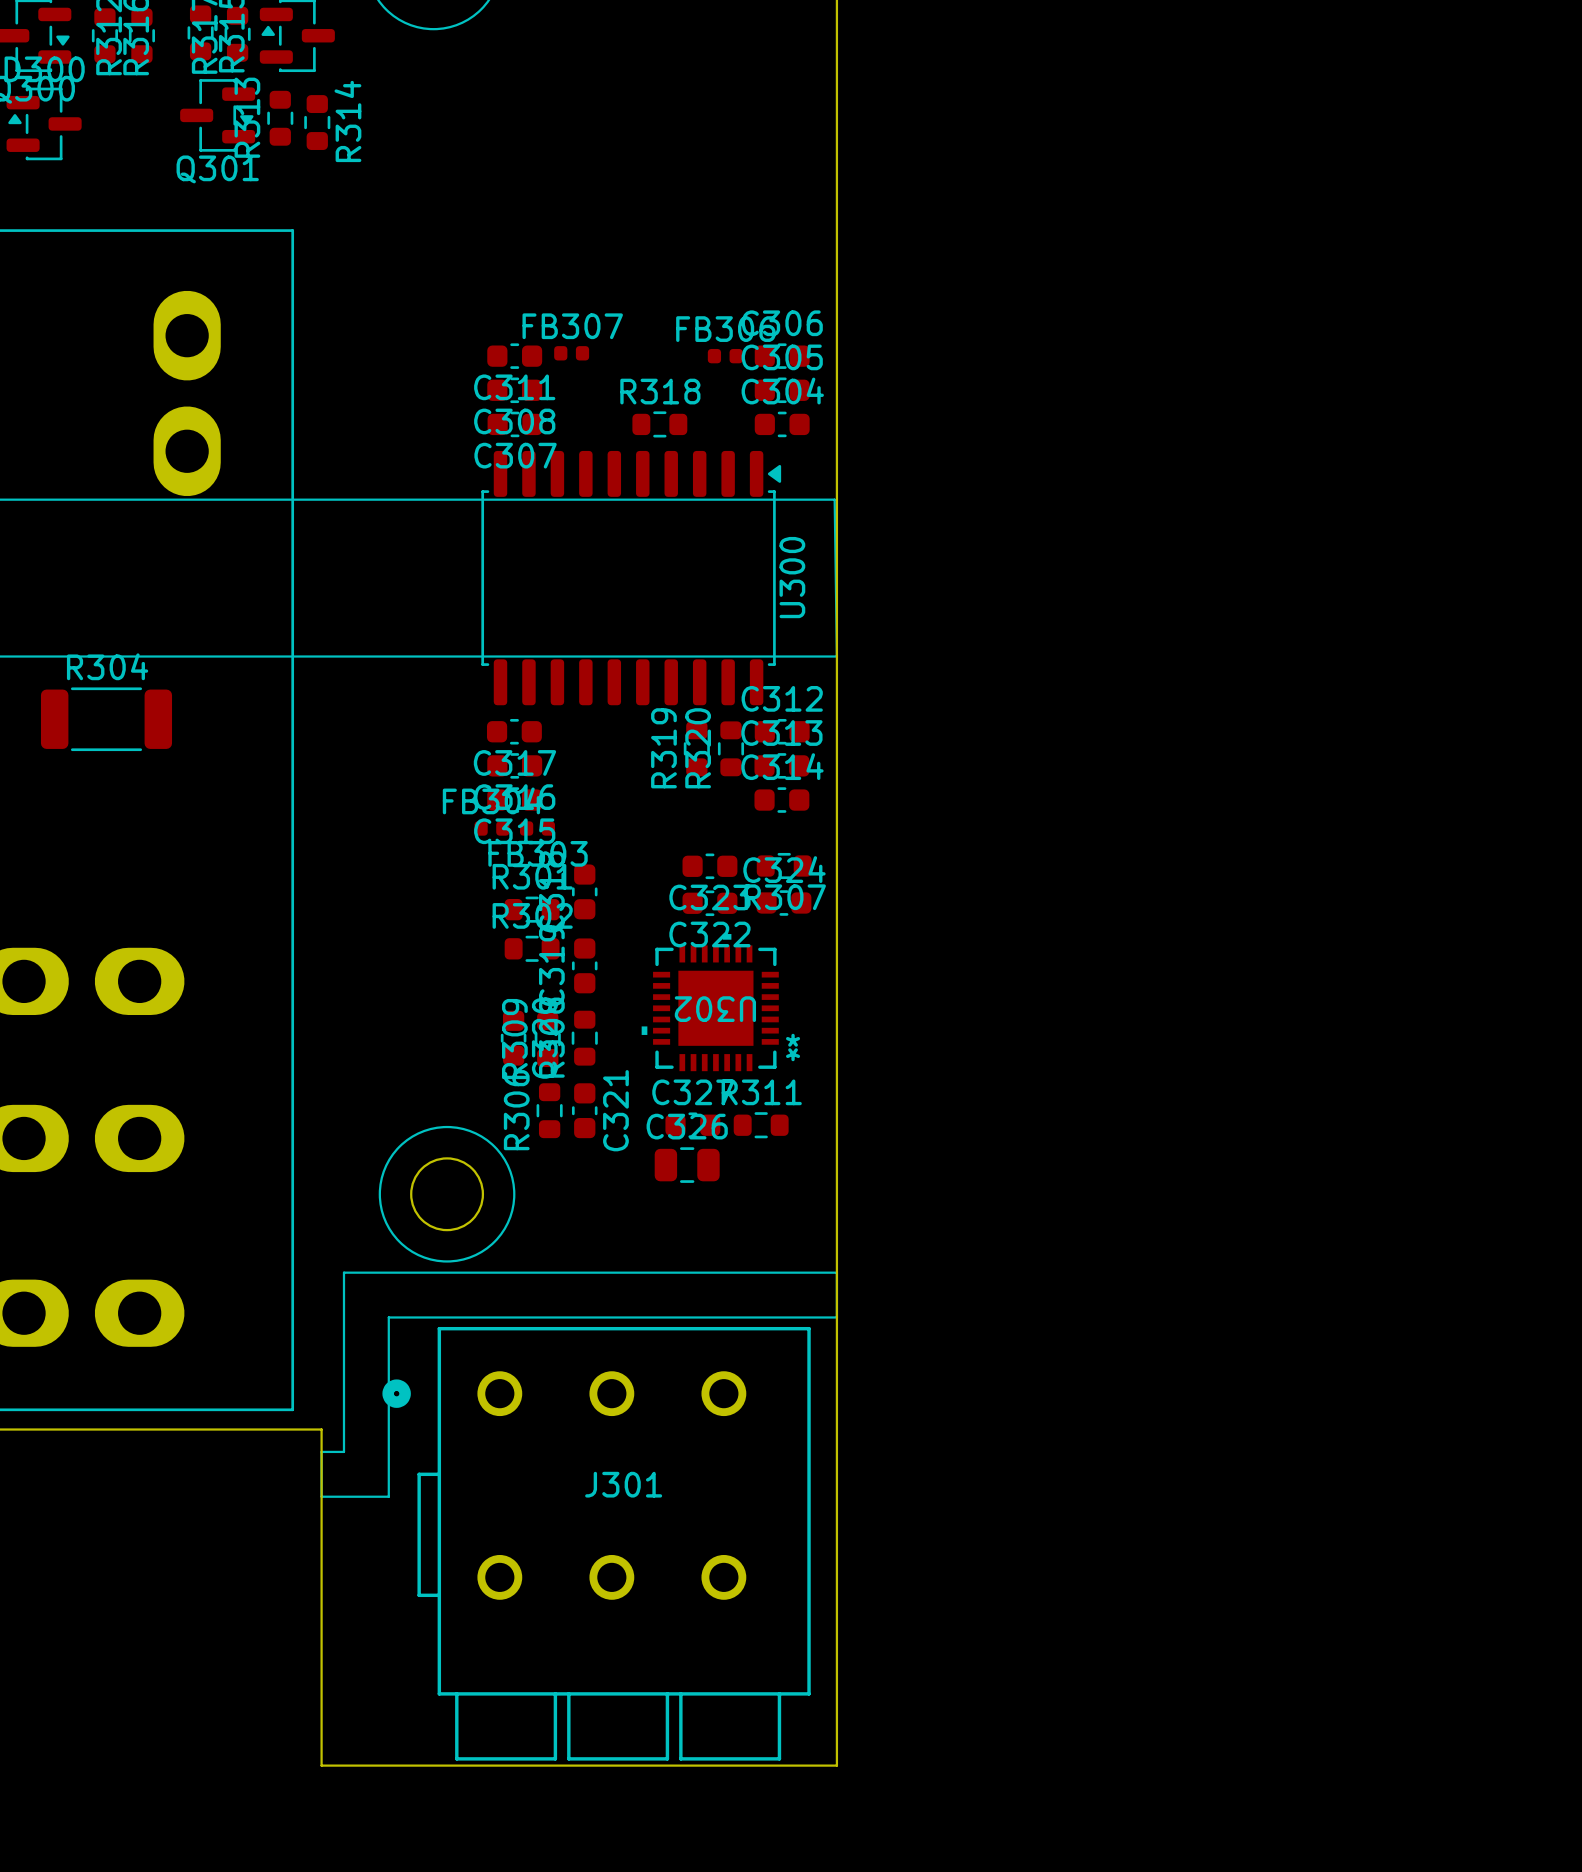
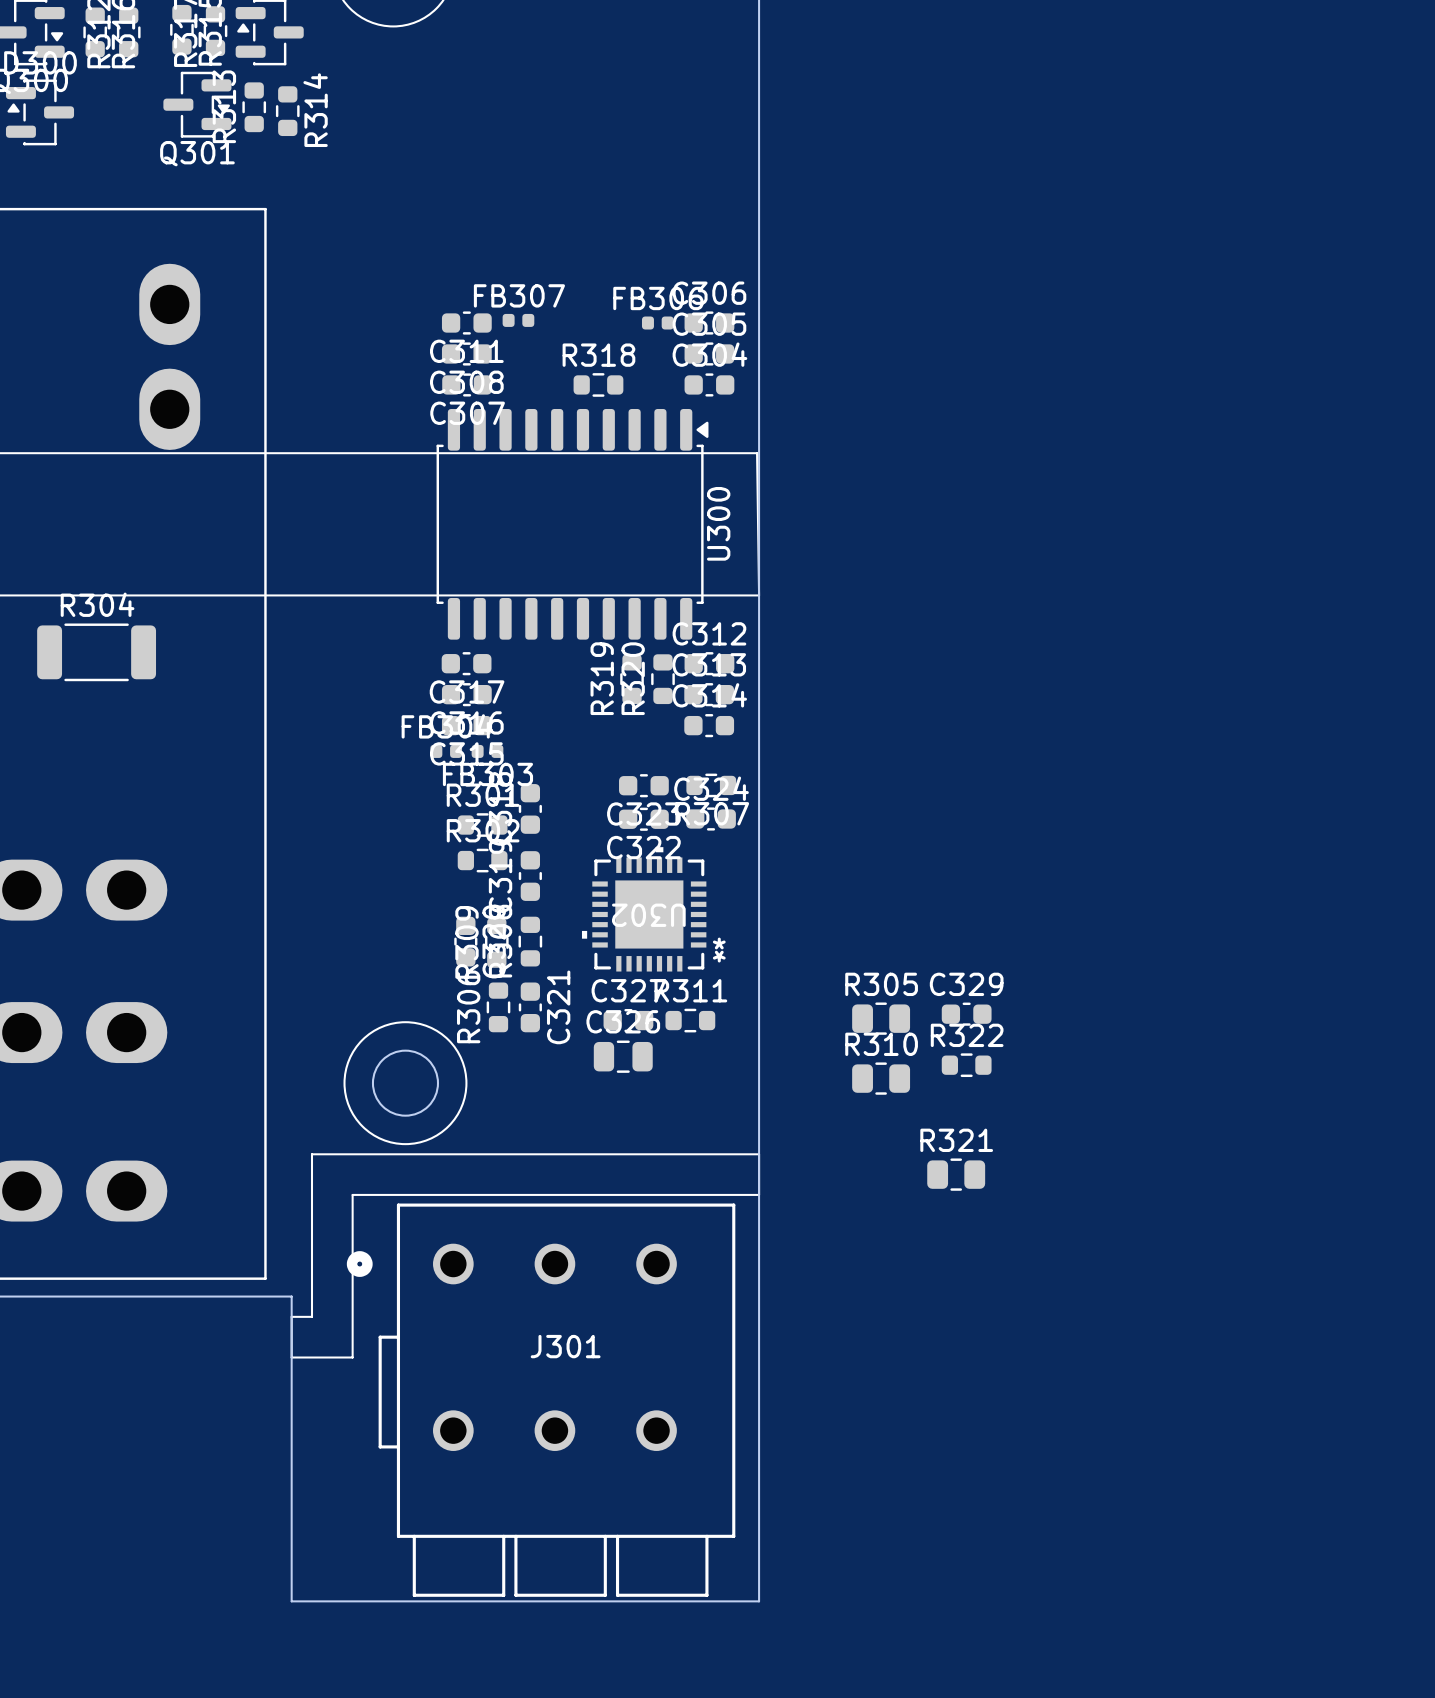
C329: none -> (966, 1014)
R305: none -> (881, 1018)
R322: none -> (966, 1065)
R310: none -> (881, 1078)
R321: none -> (956, 1174)

